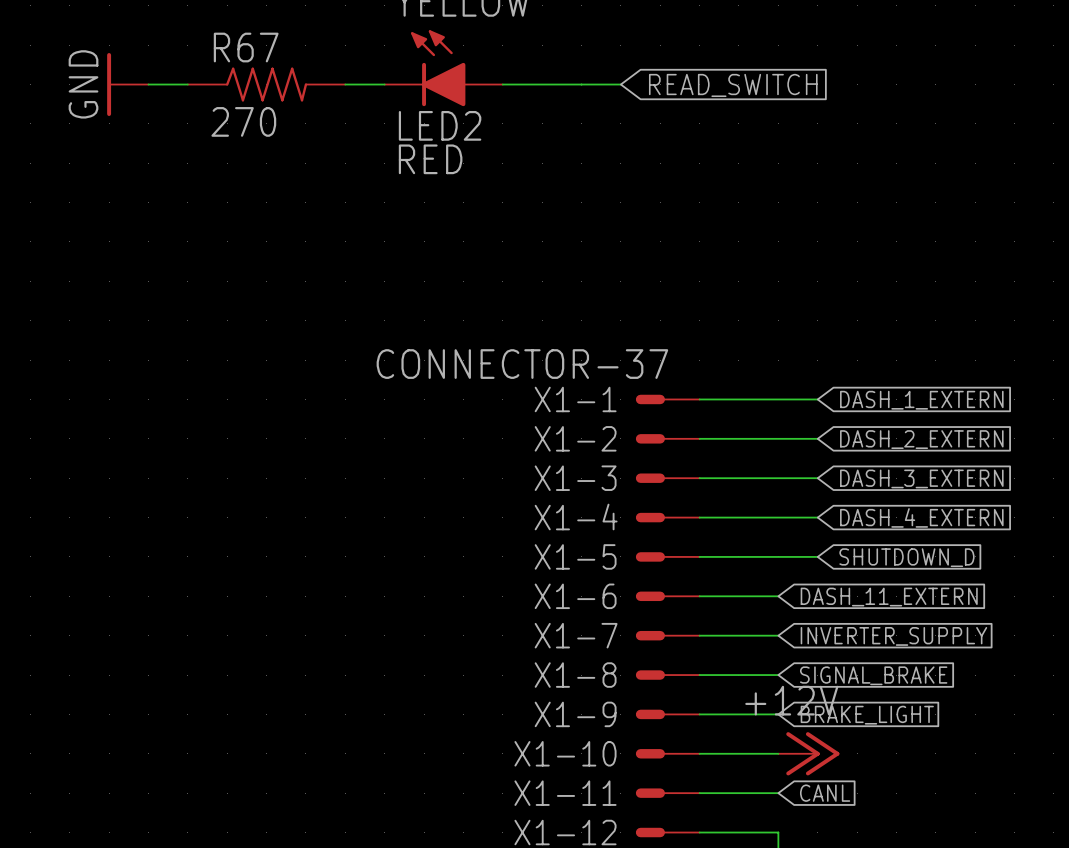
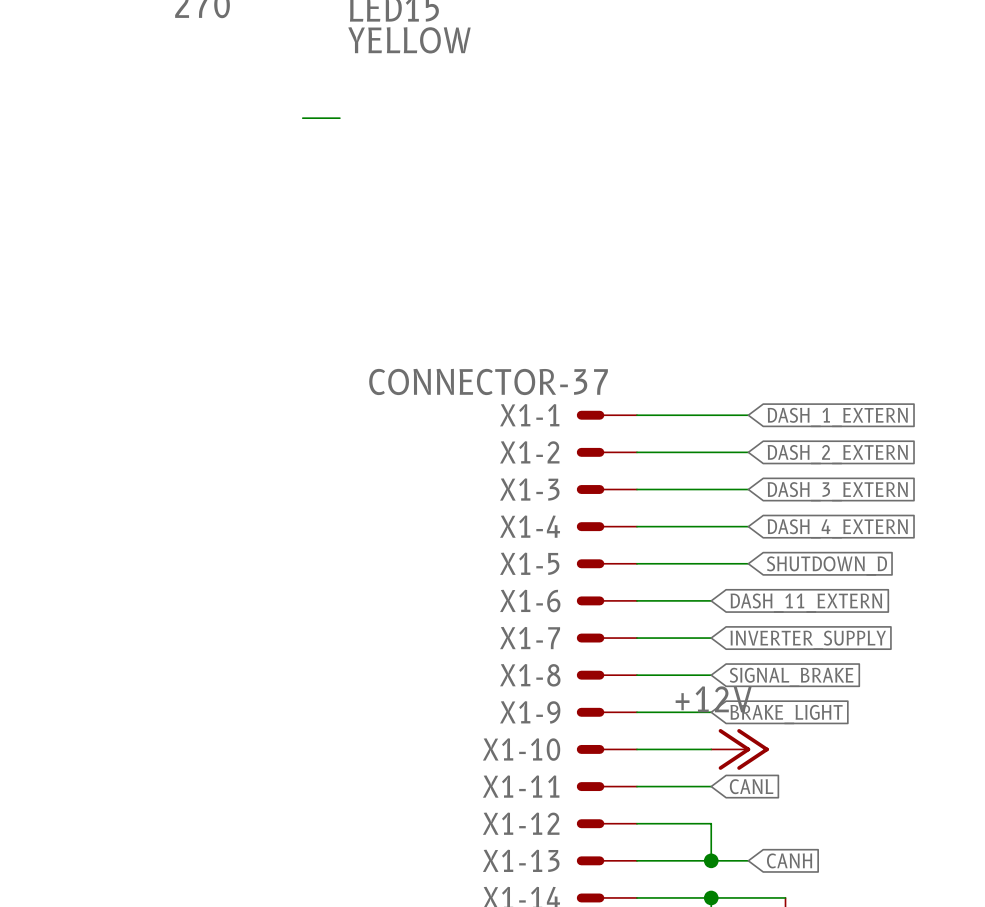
LED2: RED (443, 68) -> none
power symbol: GND (127, 84) -> none
wire: (148, 84) (187, 84) -> none
R67: 270 (266, 84) -> none
wire: (502, 84) (620, 84) -> none
global label: READ_SWITCH (733, 85) -> none

